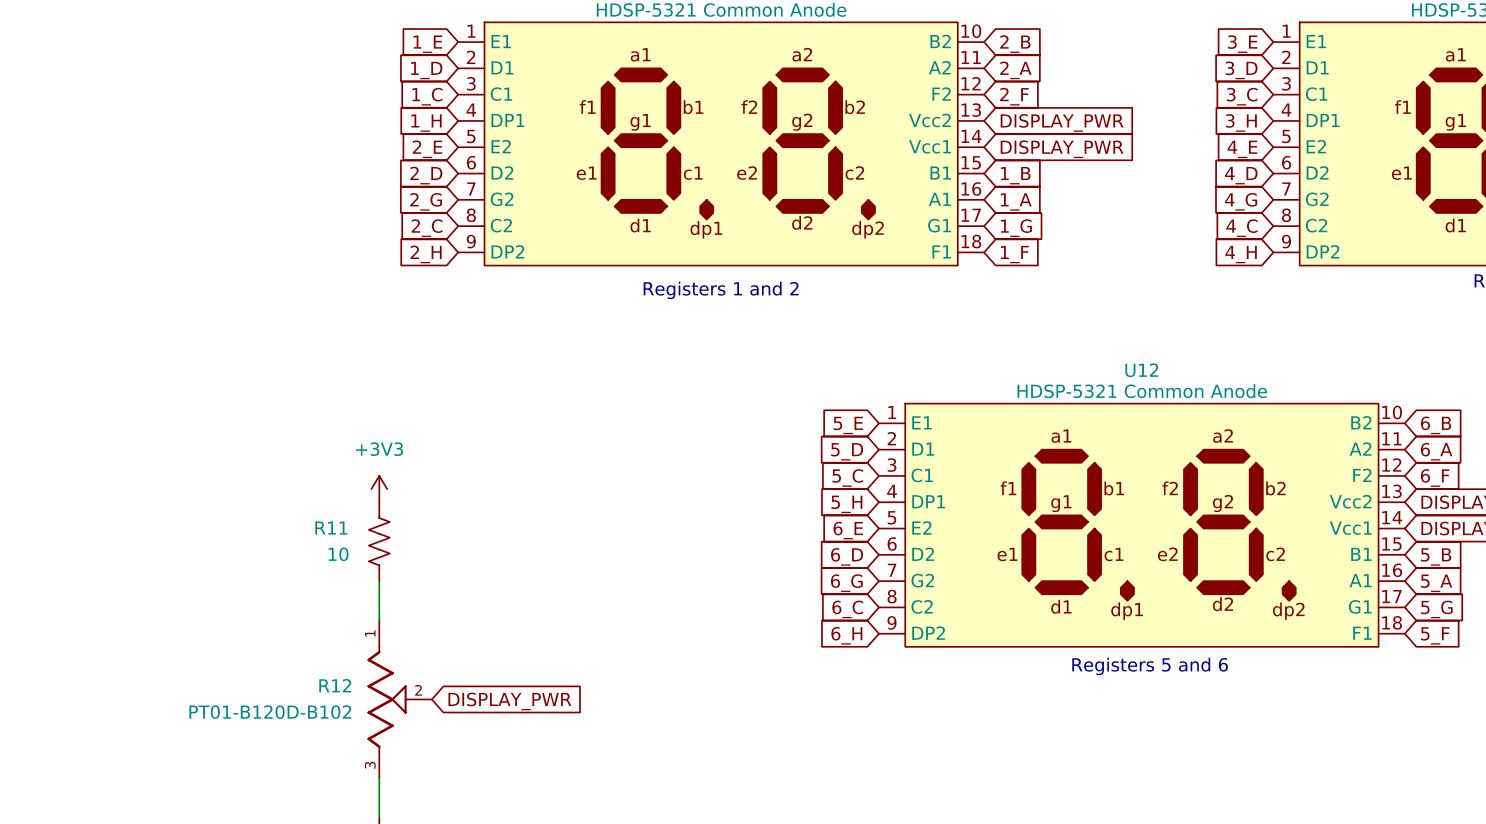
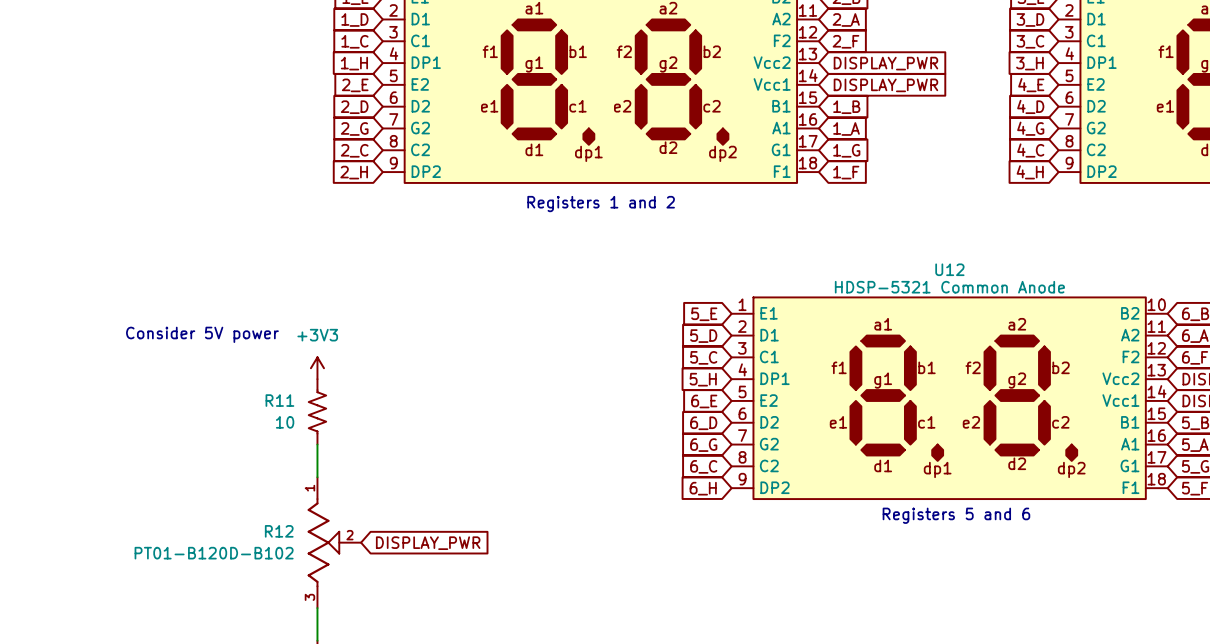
text: none -> Consider 5V power (202, 334)

